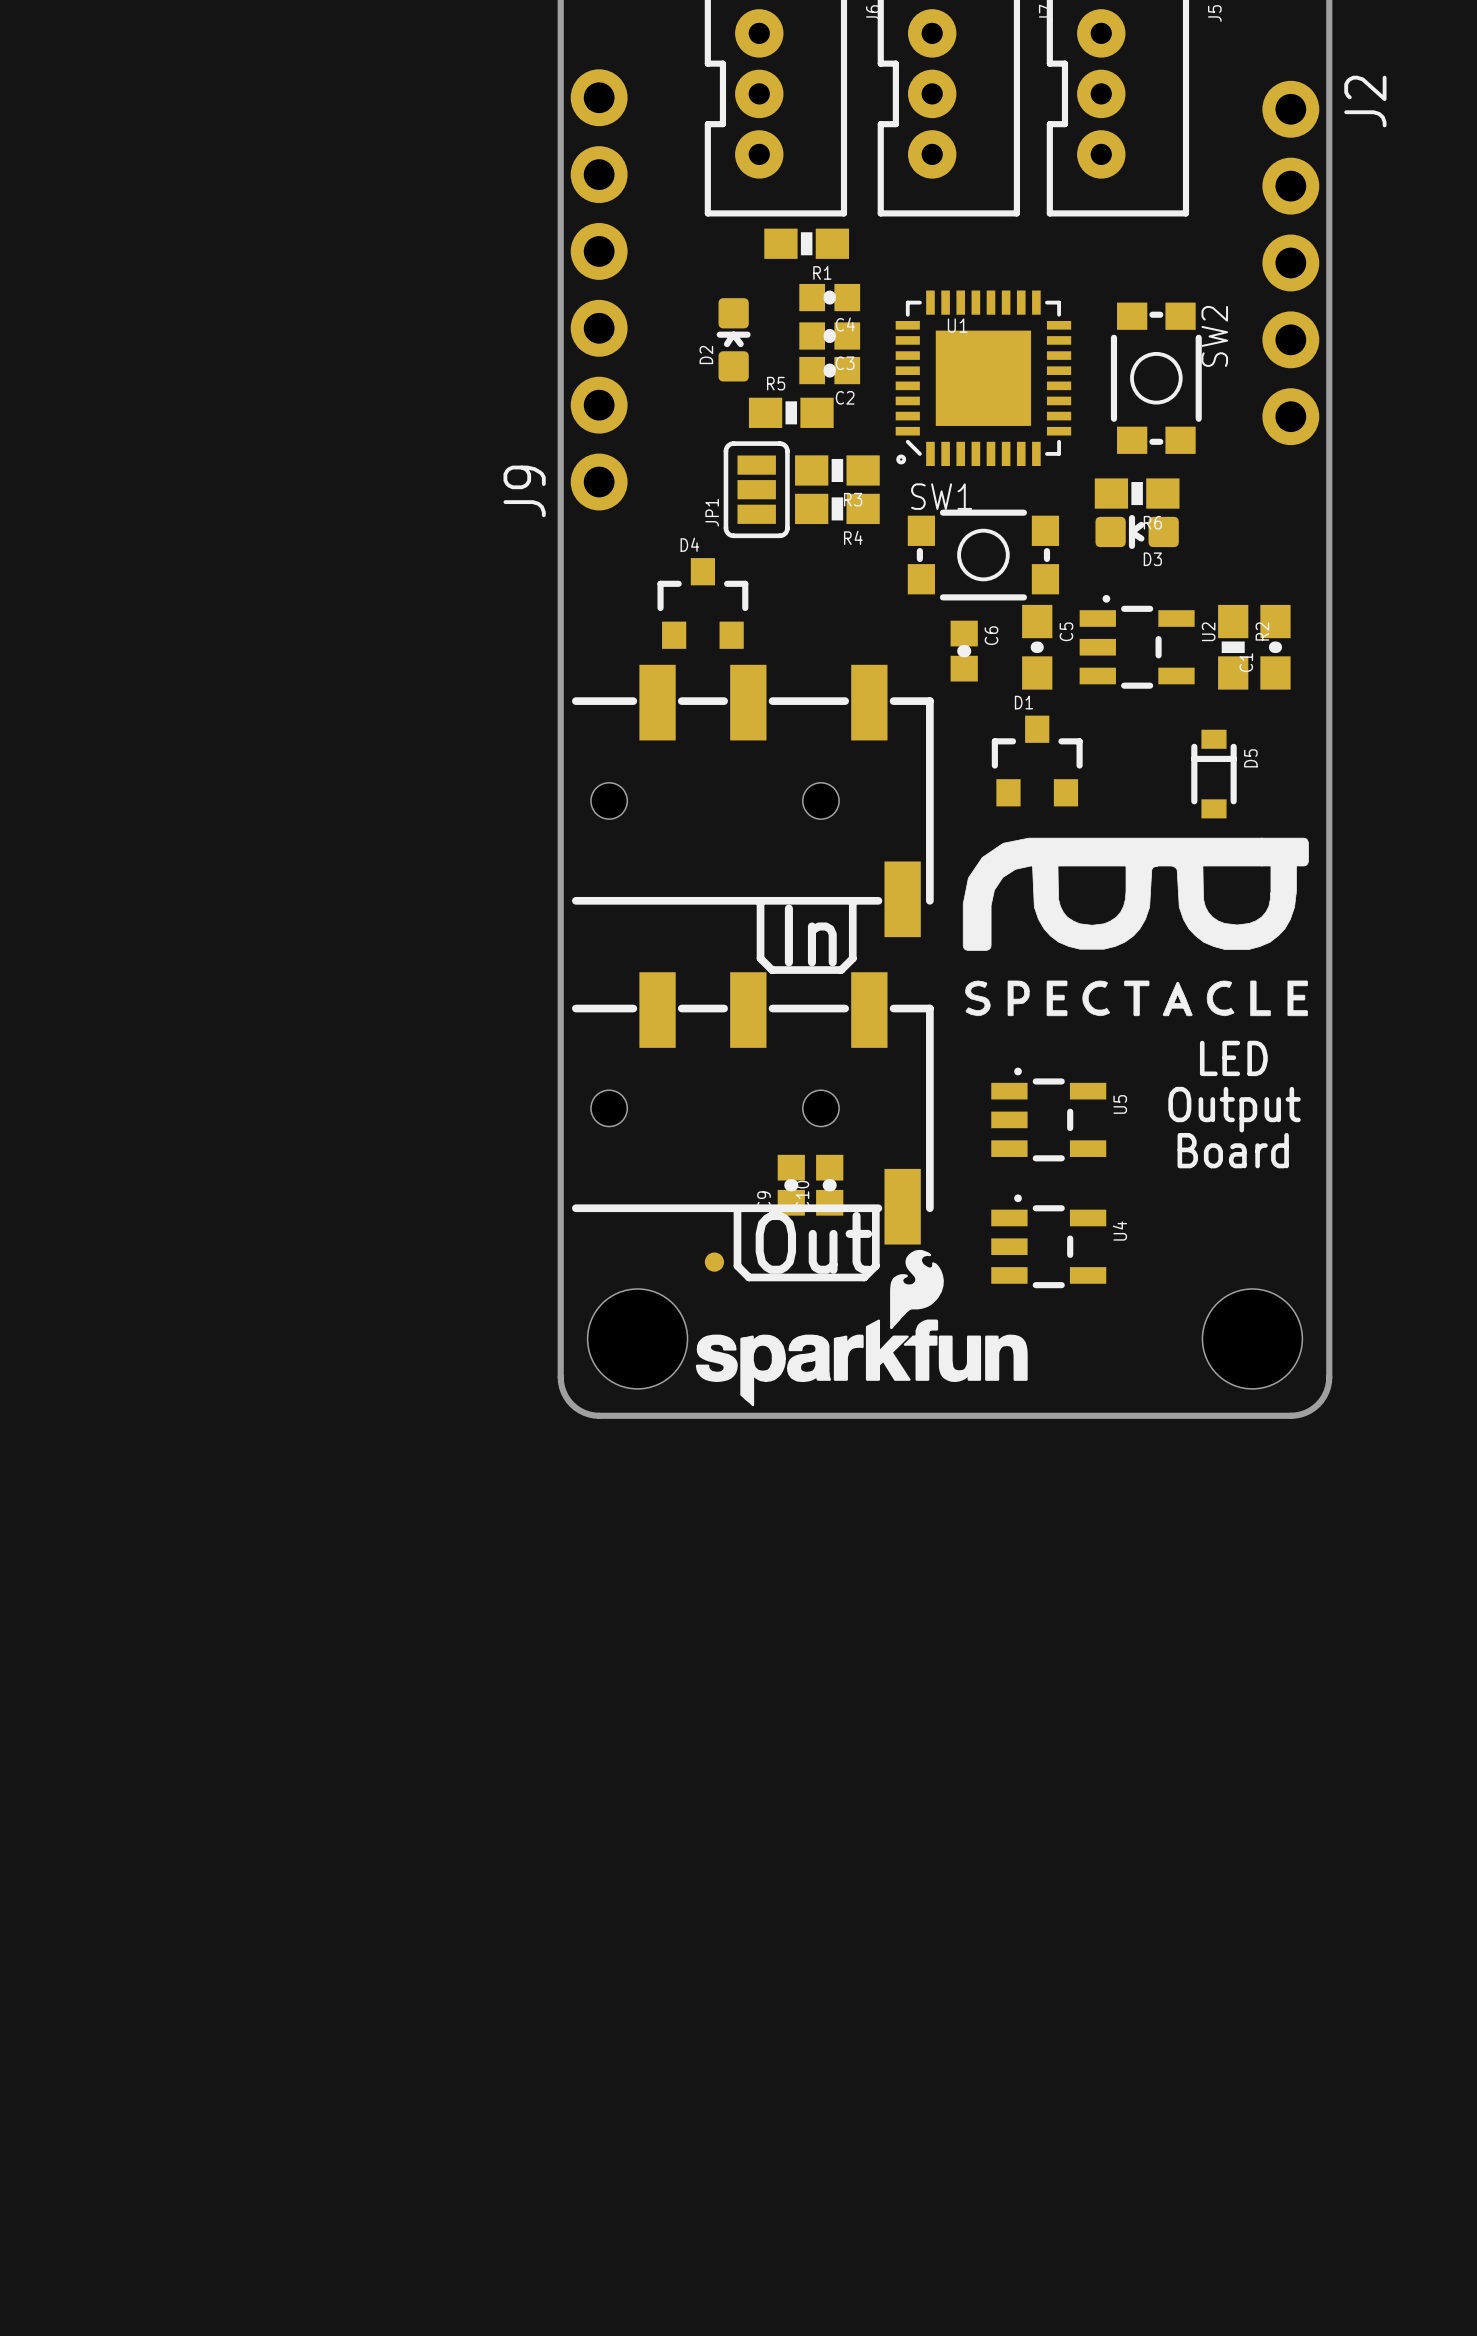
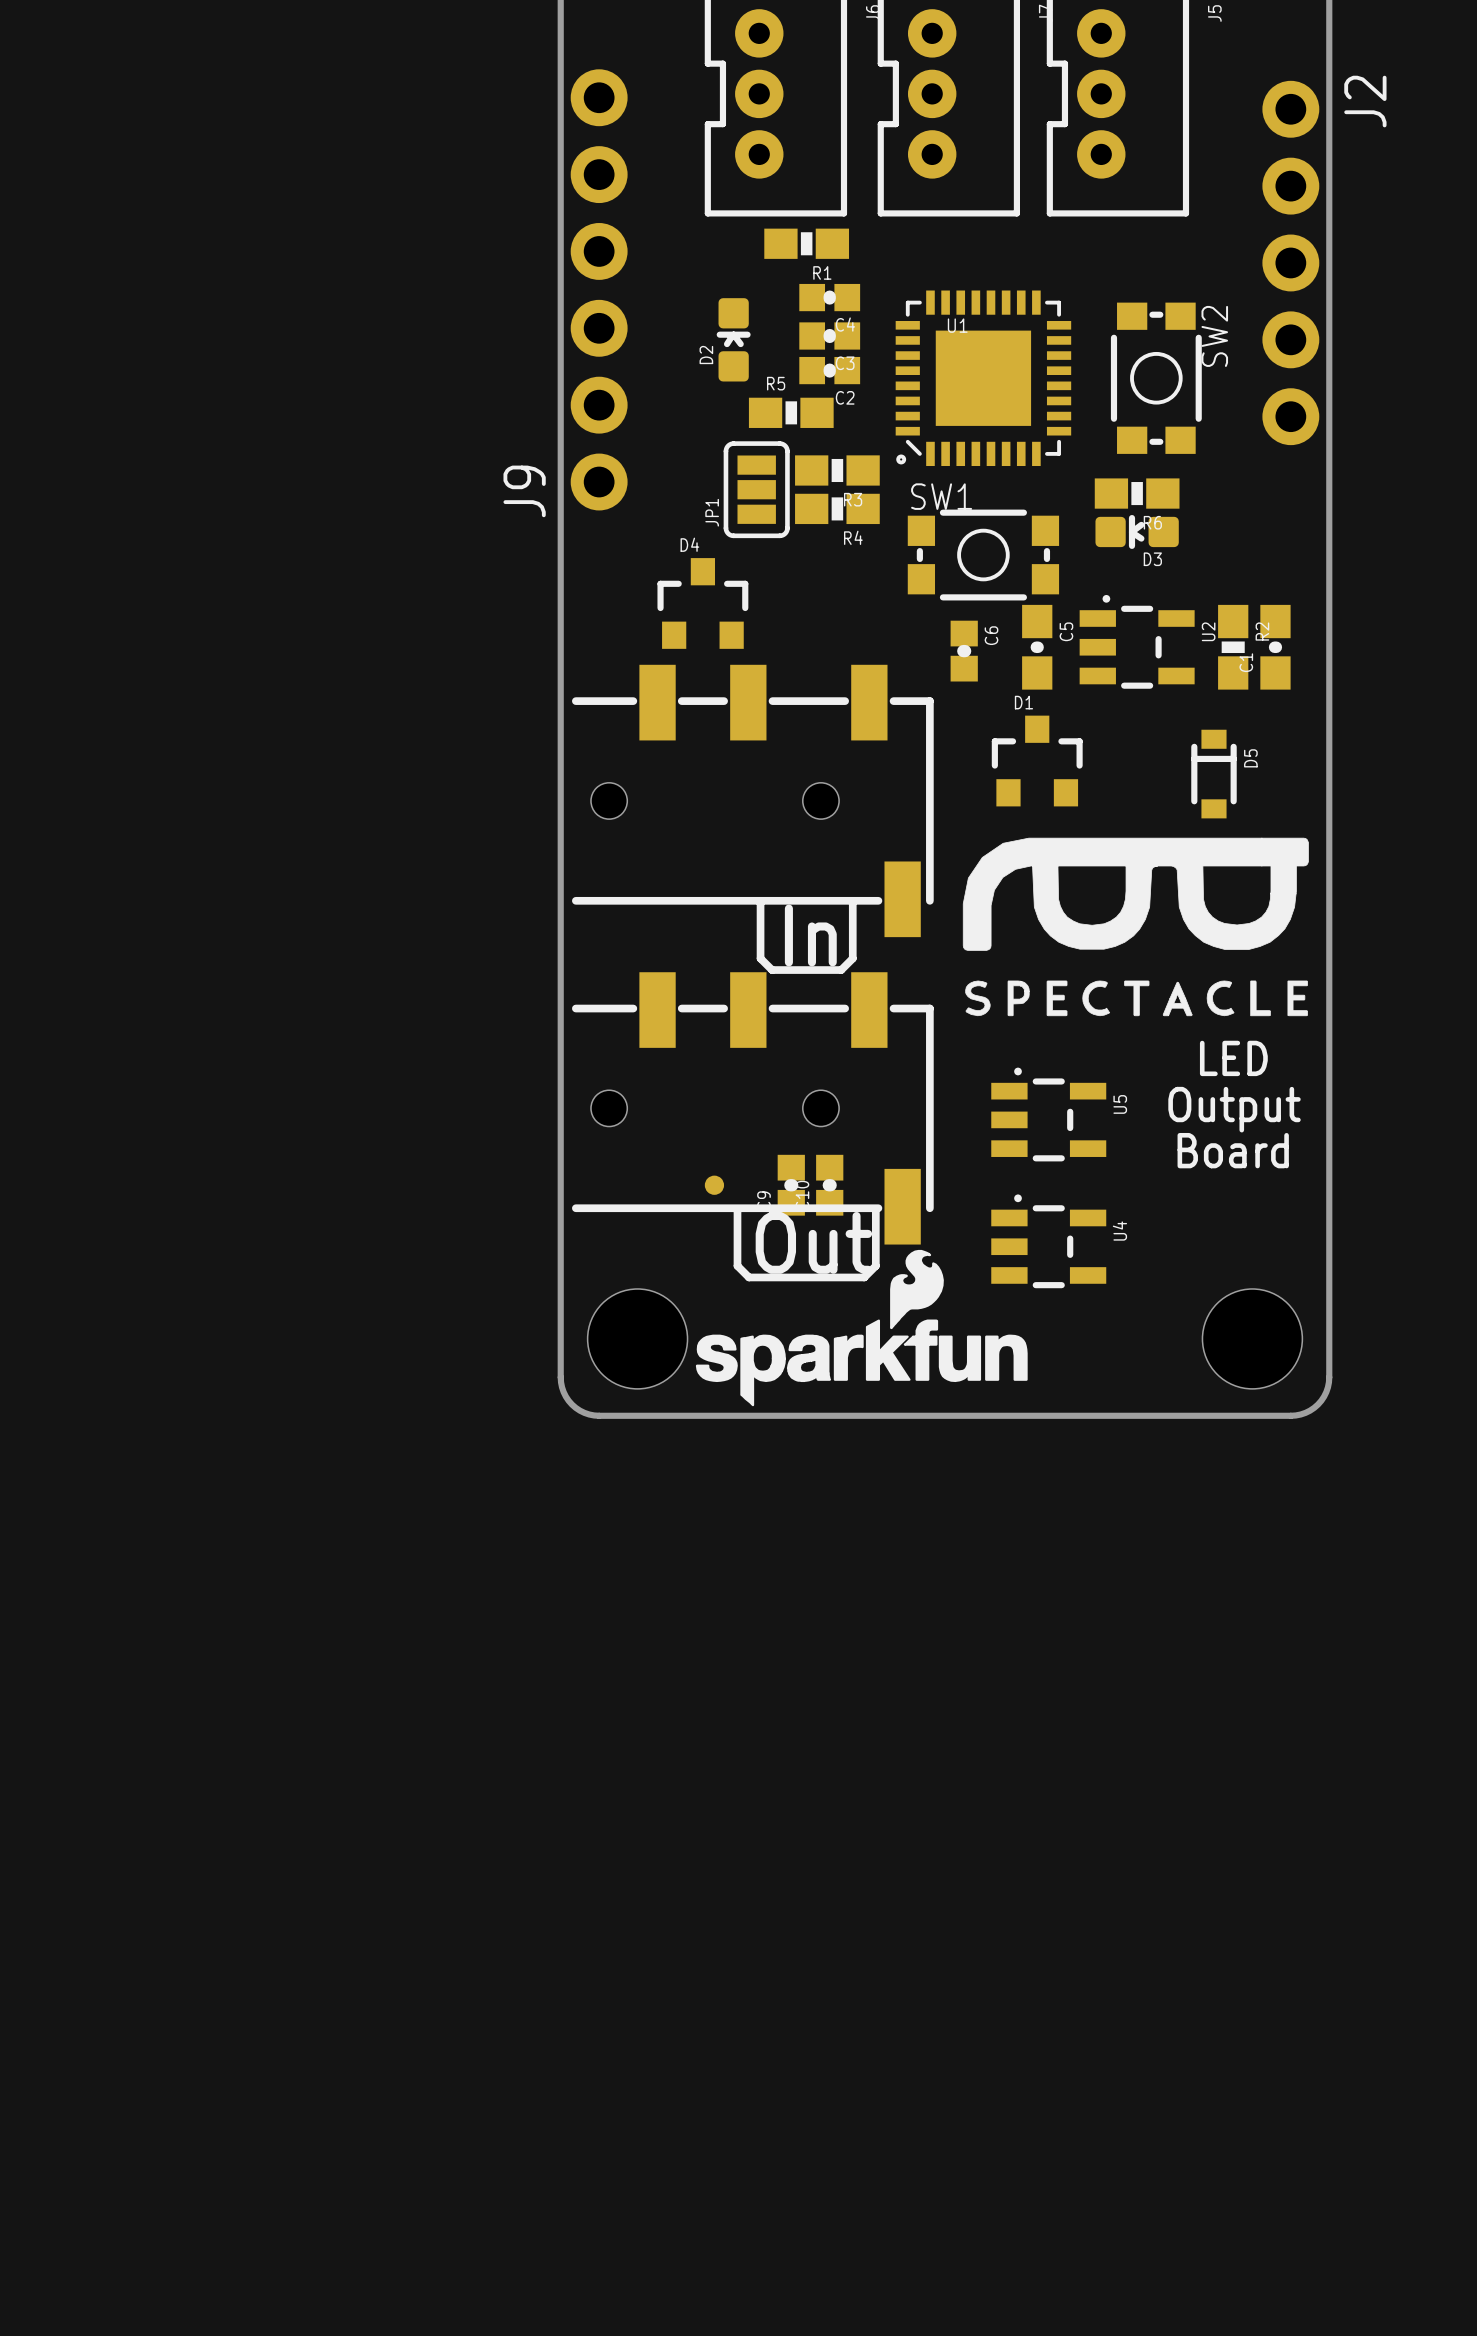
part position: (714, 1262) -> (714, 1185)

